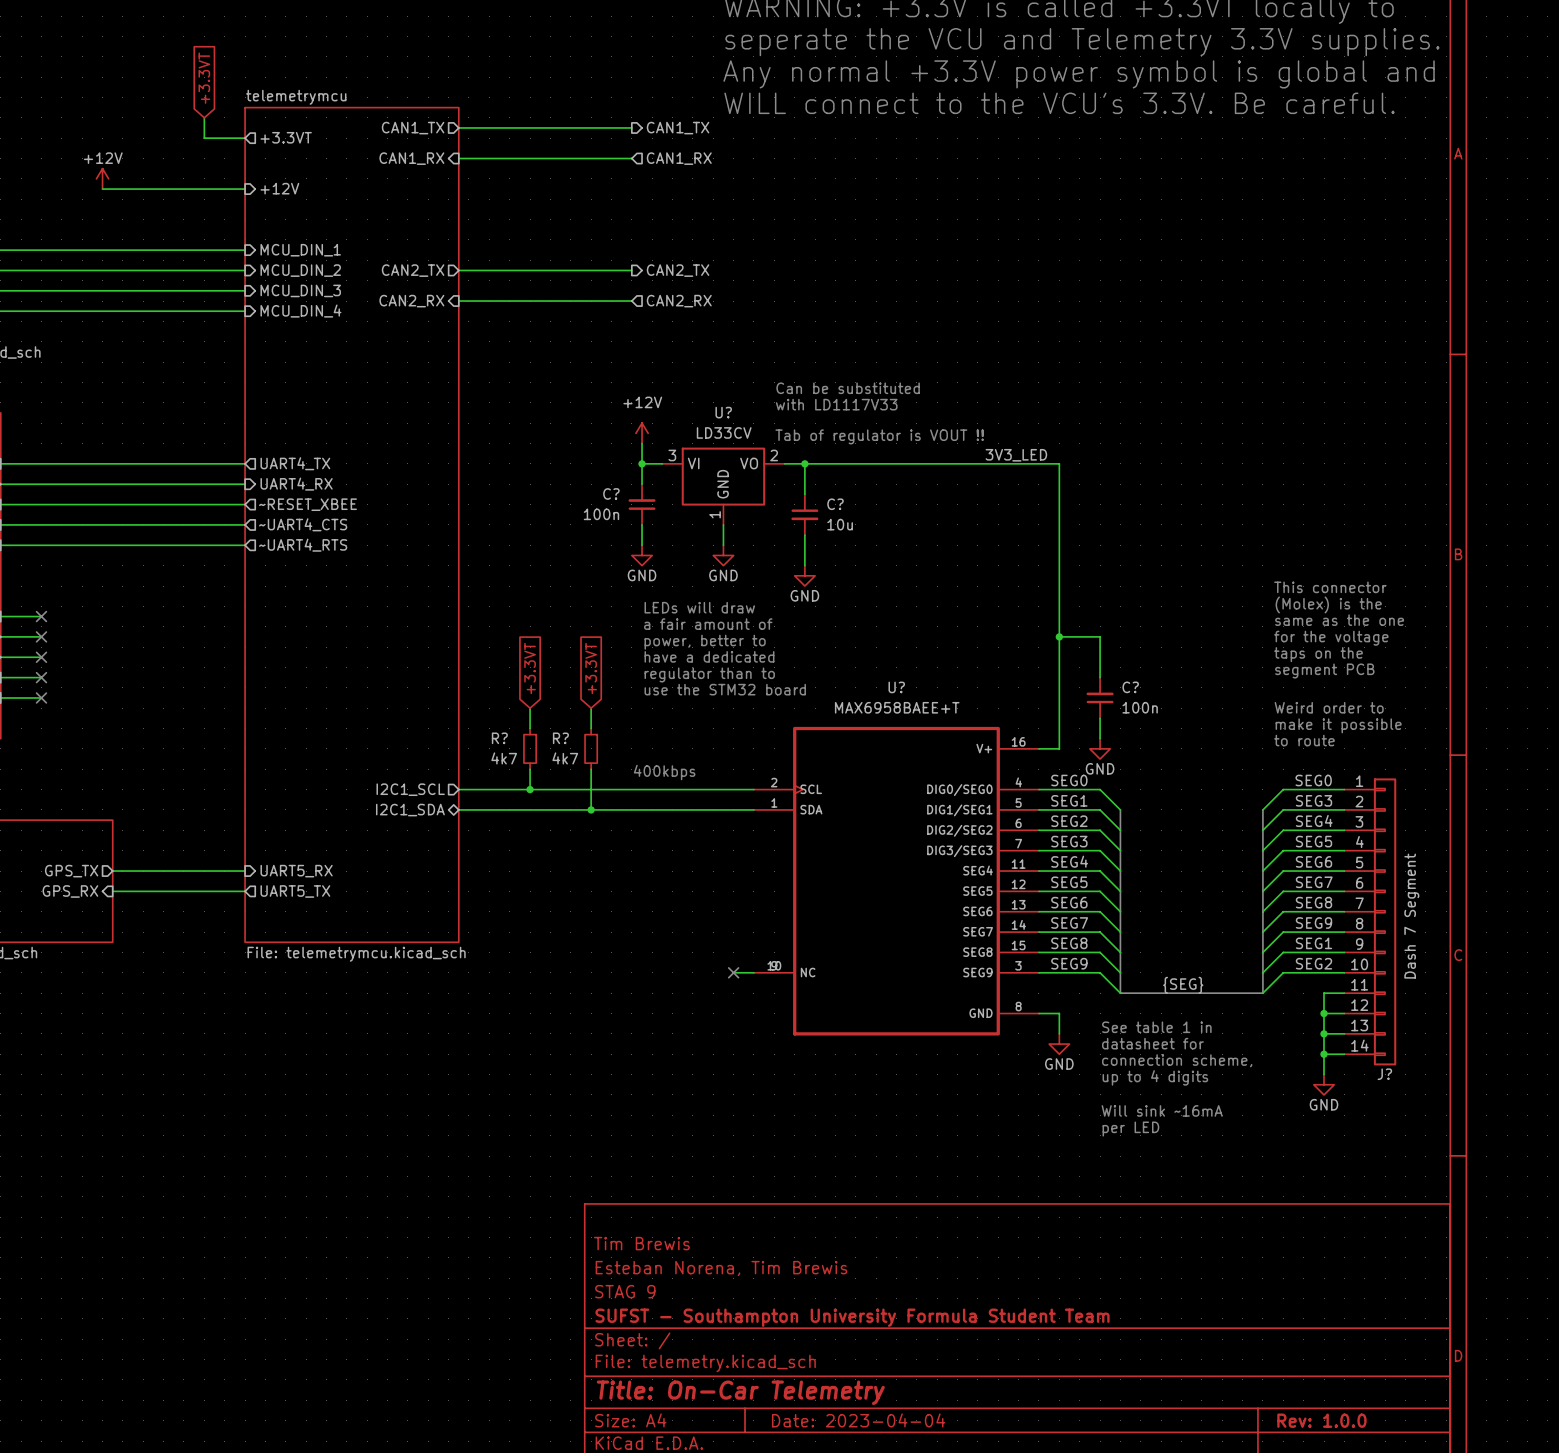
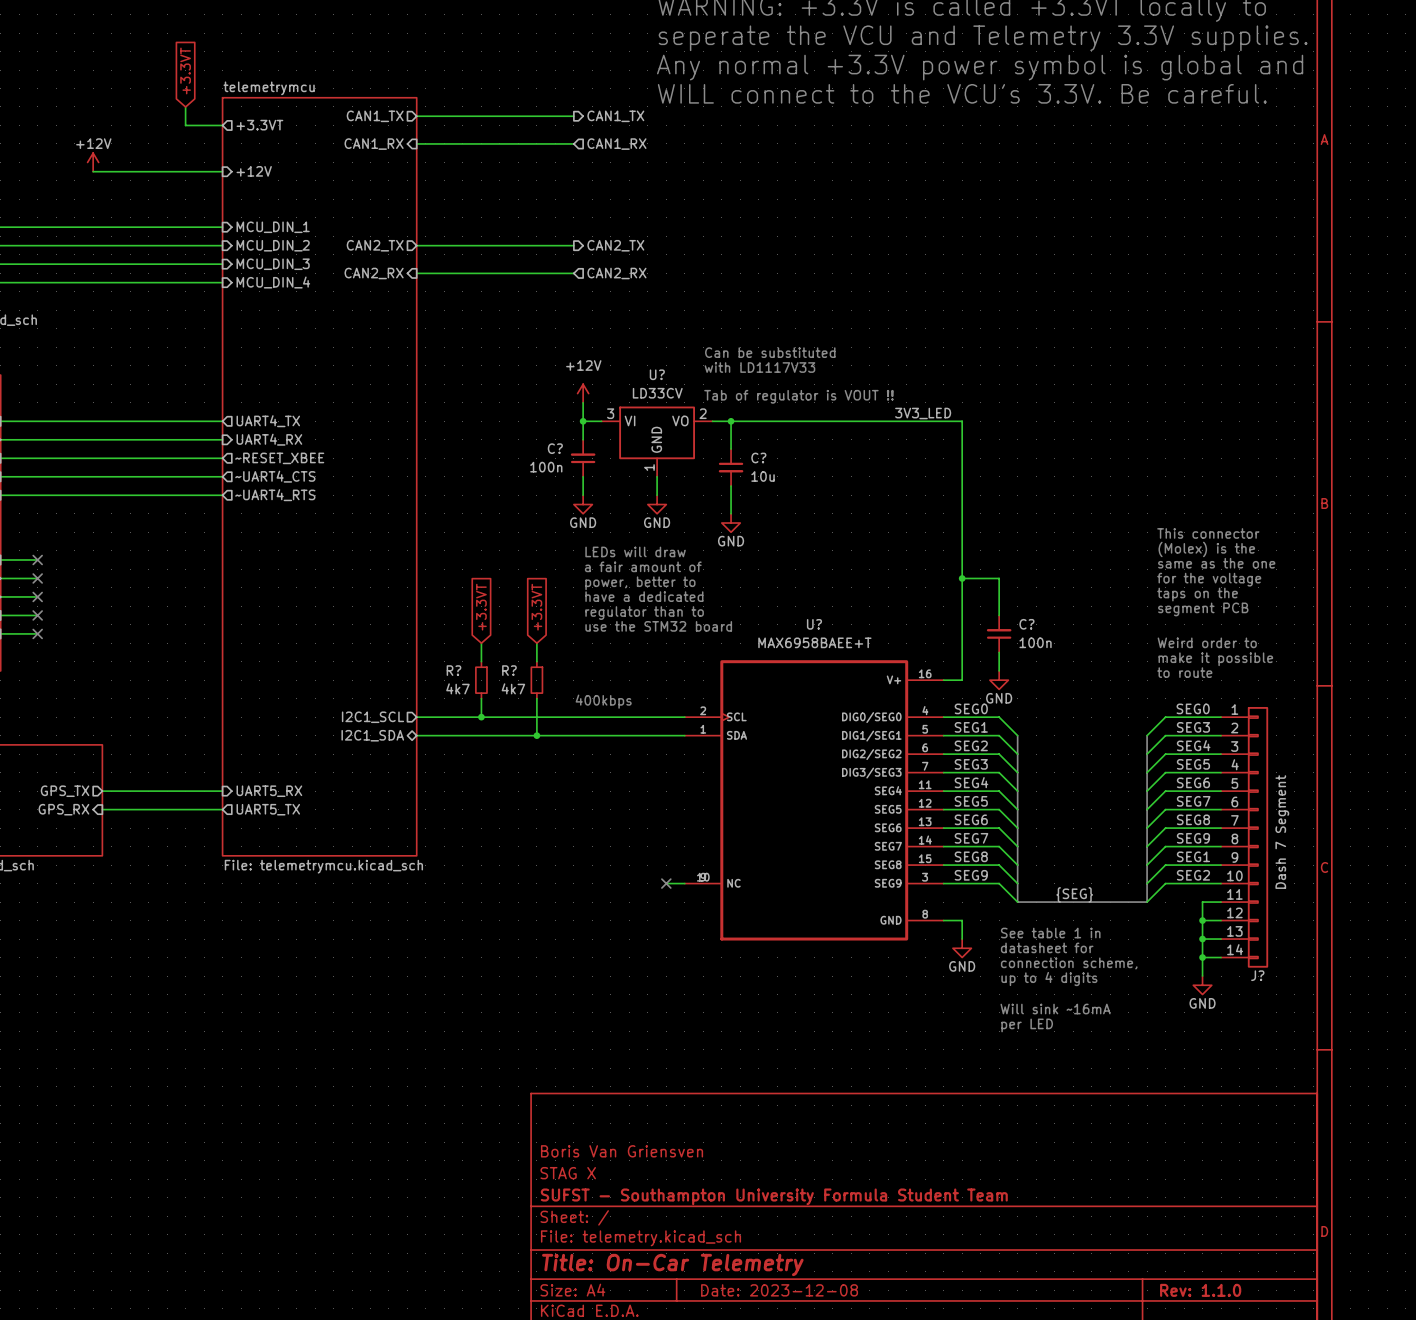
title block: Tim Brewis (641, 1243) -> none
title block: Esteban Norena, Tim Brewis (721, 1268) -> Boris Van Griensven (622, 1151)
title block: STAG 9 (625, 1291) -> STAG X (568, 1173)
title block: Date: 2023-04-04 (858, 1420) -> Date: 2023-12-08 (779, 1290)
title block: Rev: 1.0.0 (1321, 1420) -> Rev: 1.1.0 (1200, 1290)

